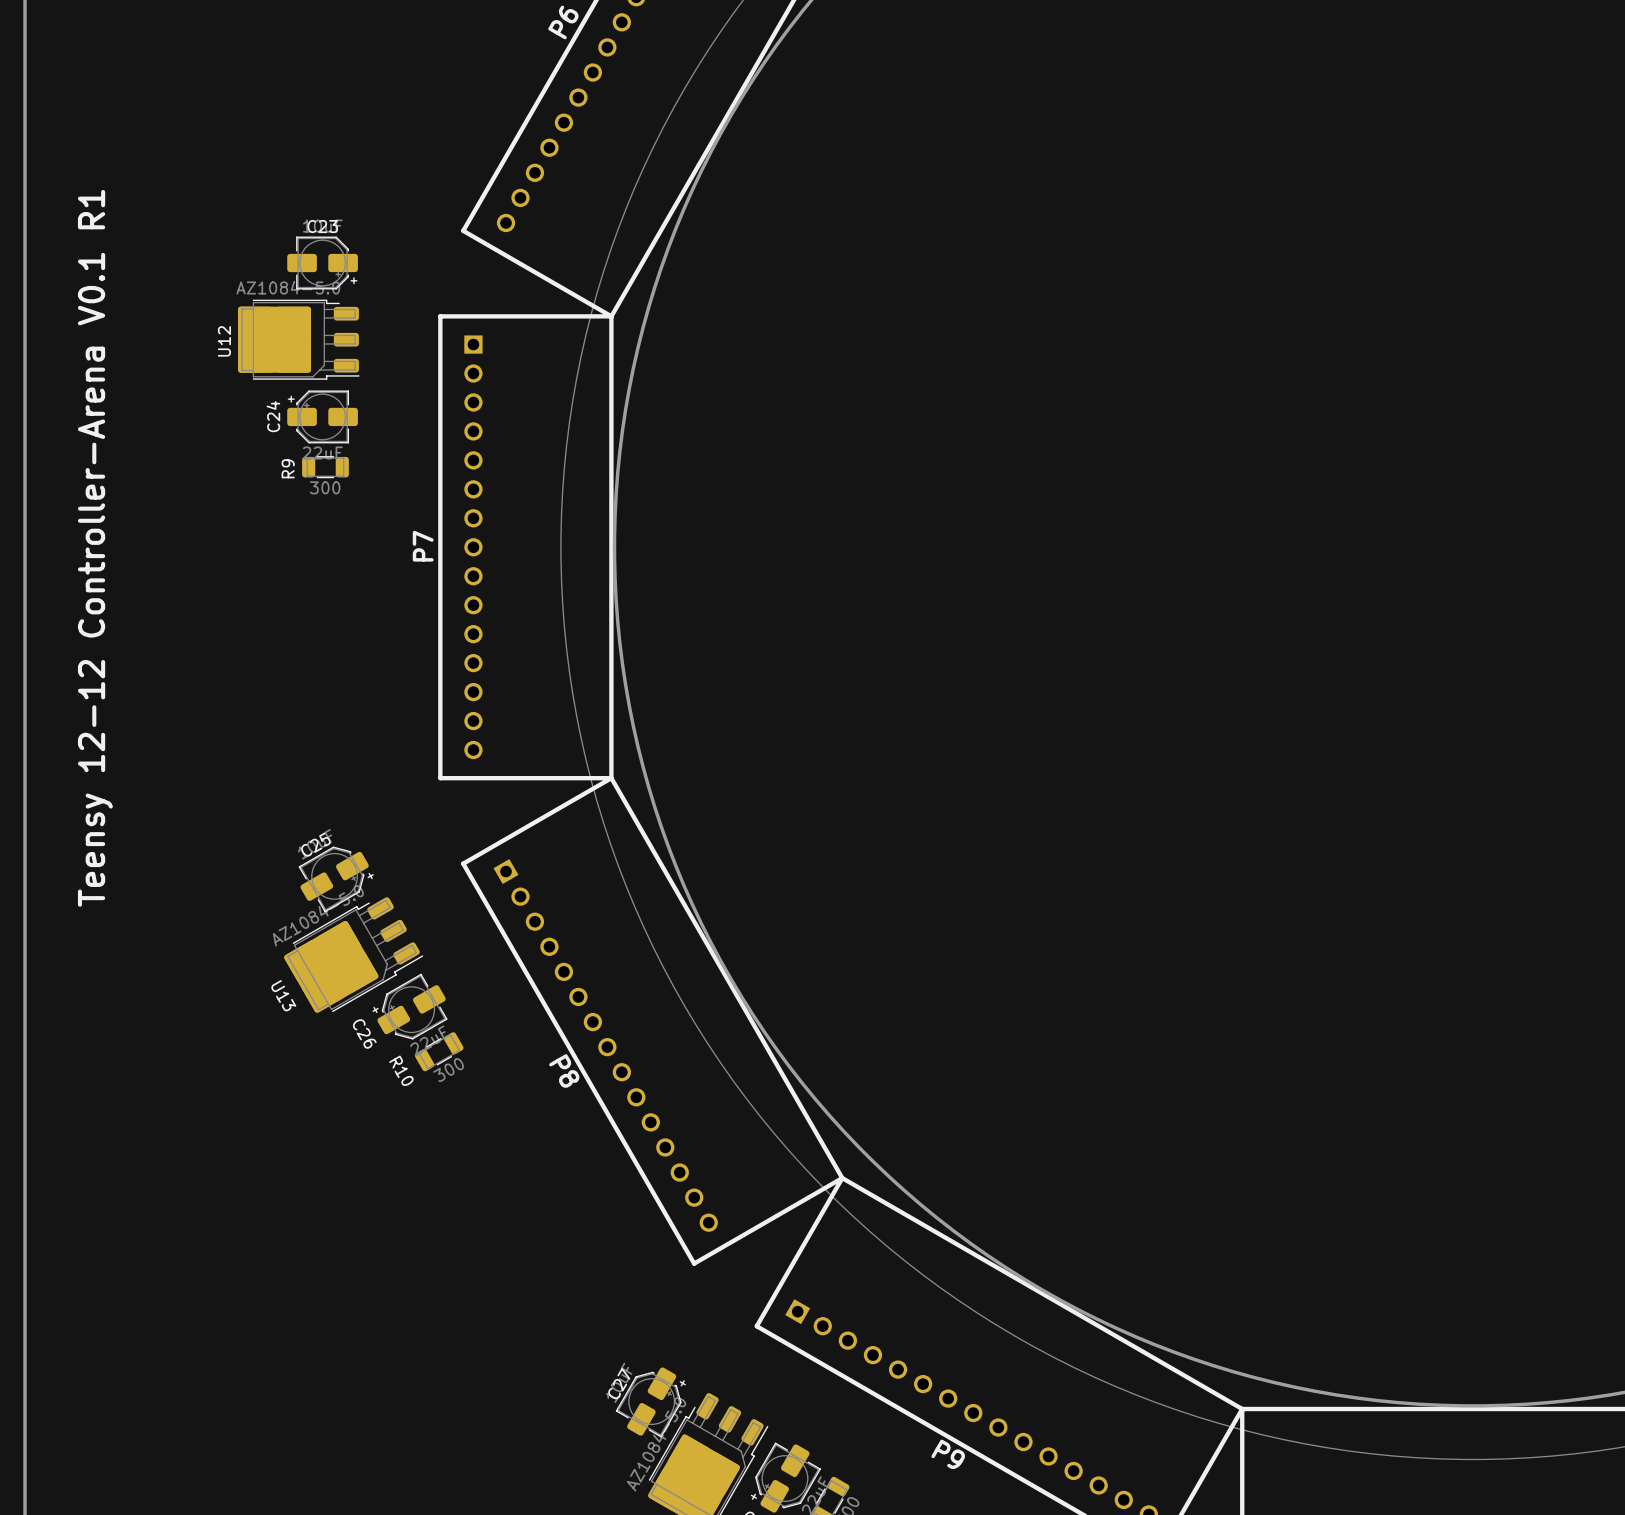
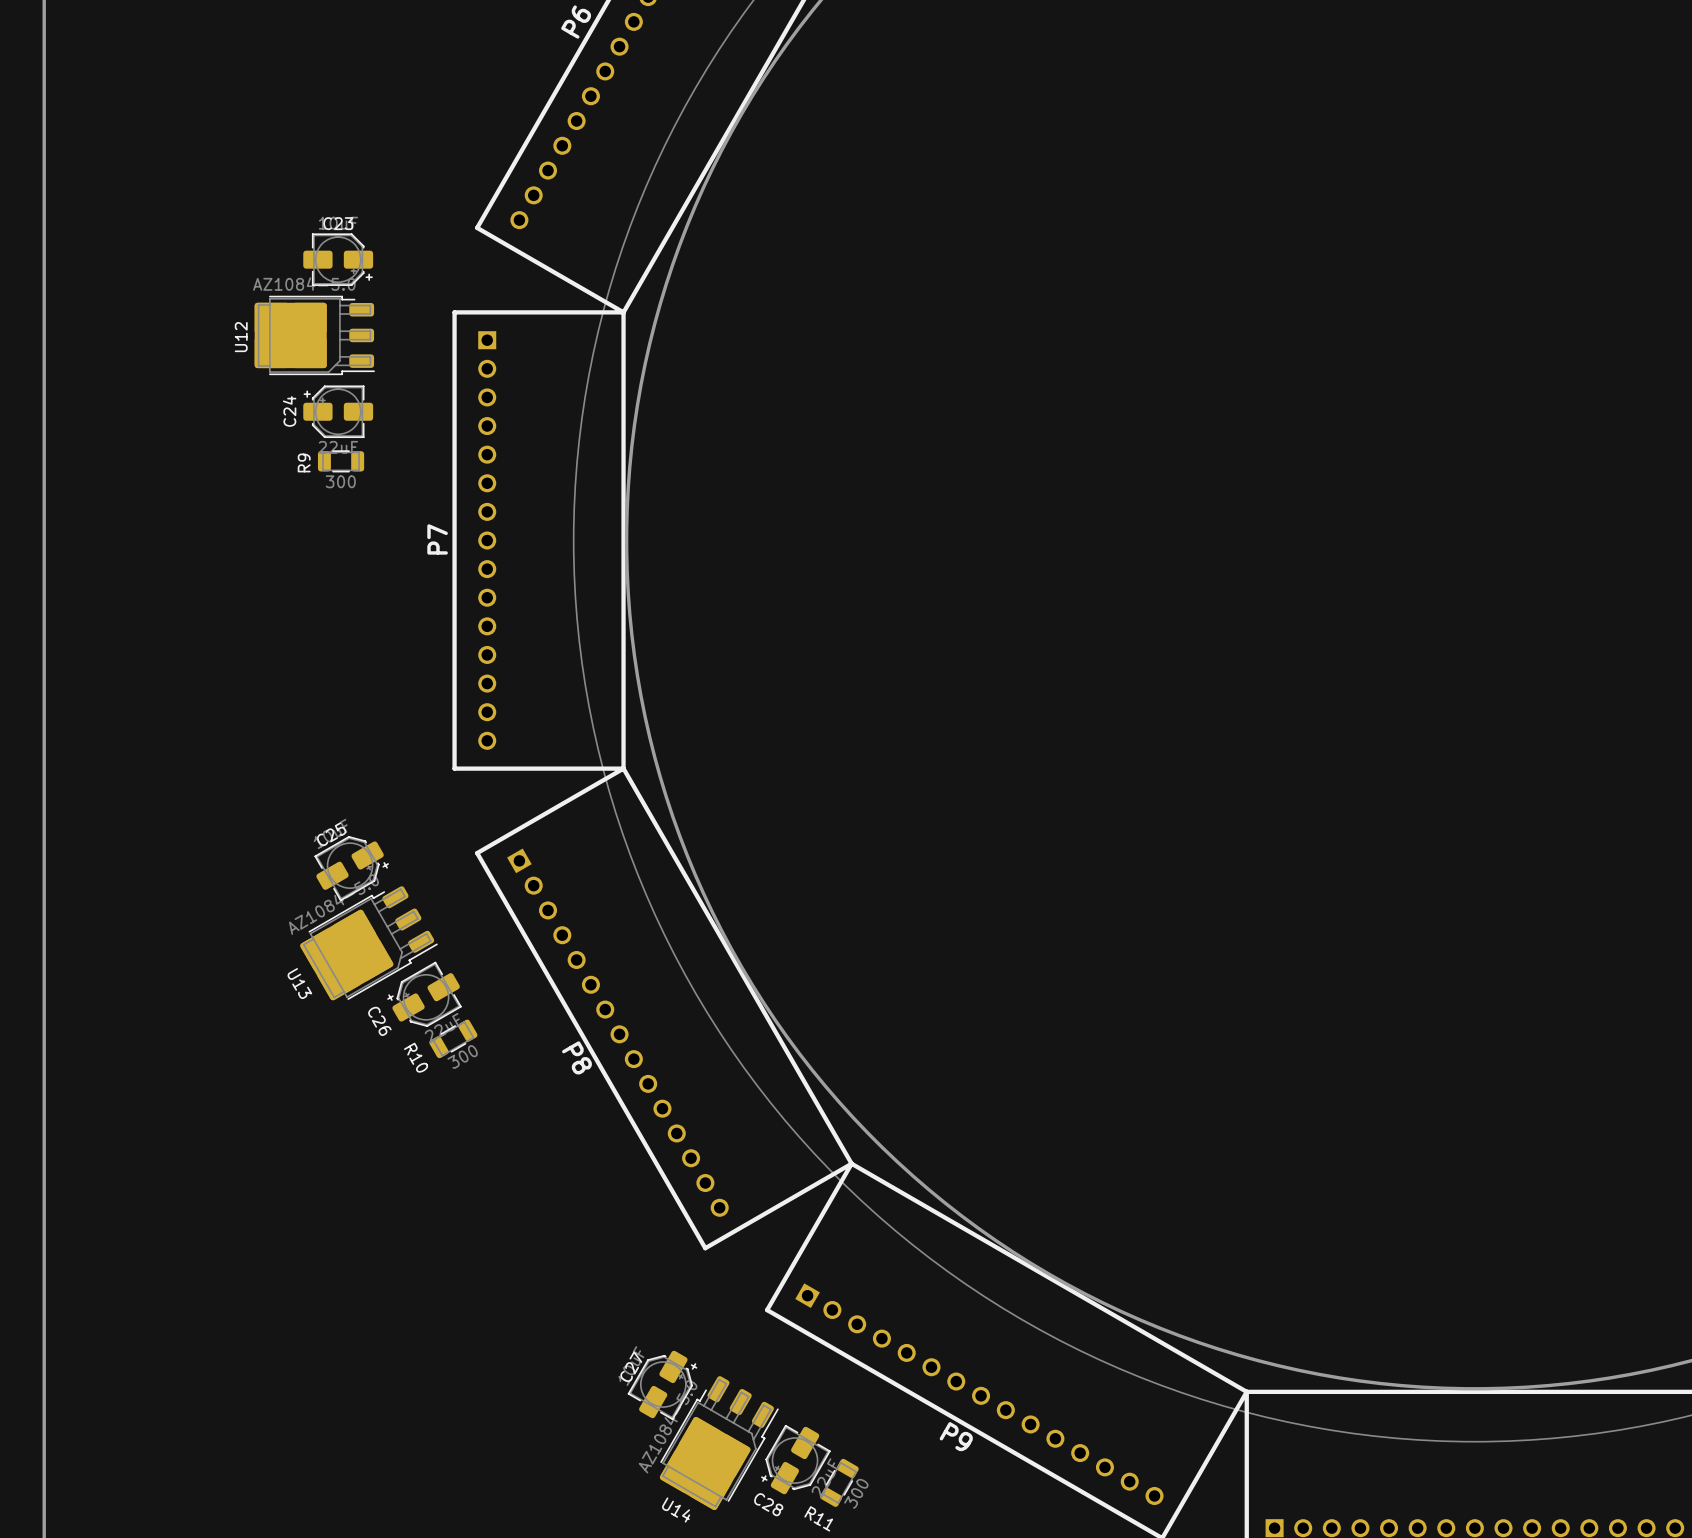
text: Teensy 12-12 Controller-Arena V0.1 R1 (95, 548) -> none

